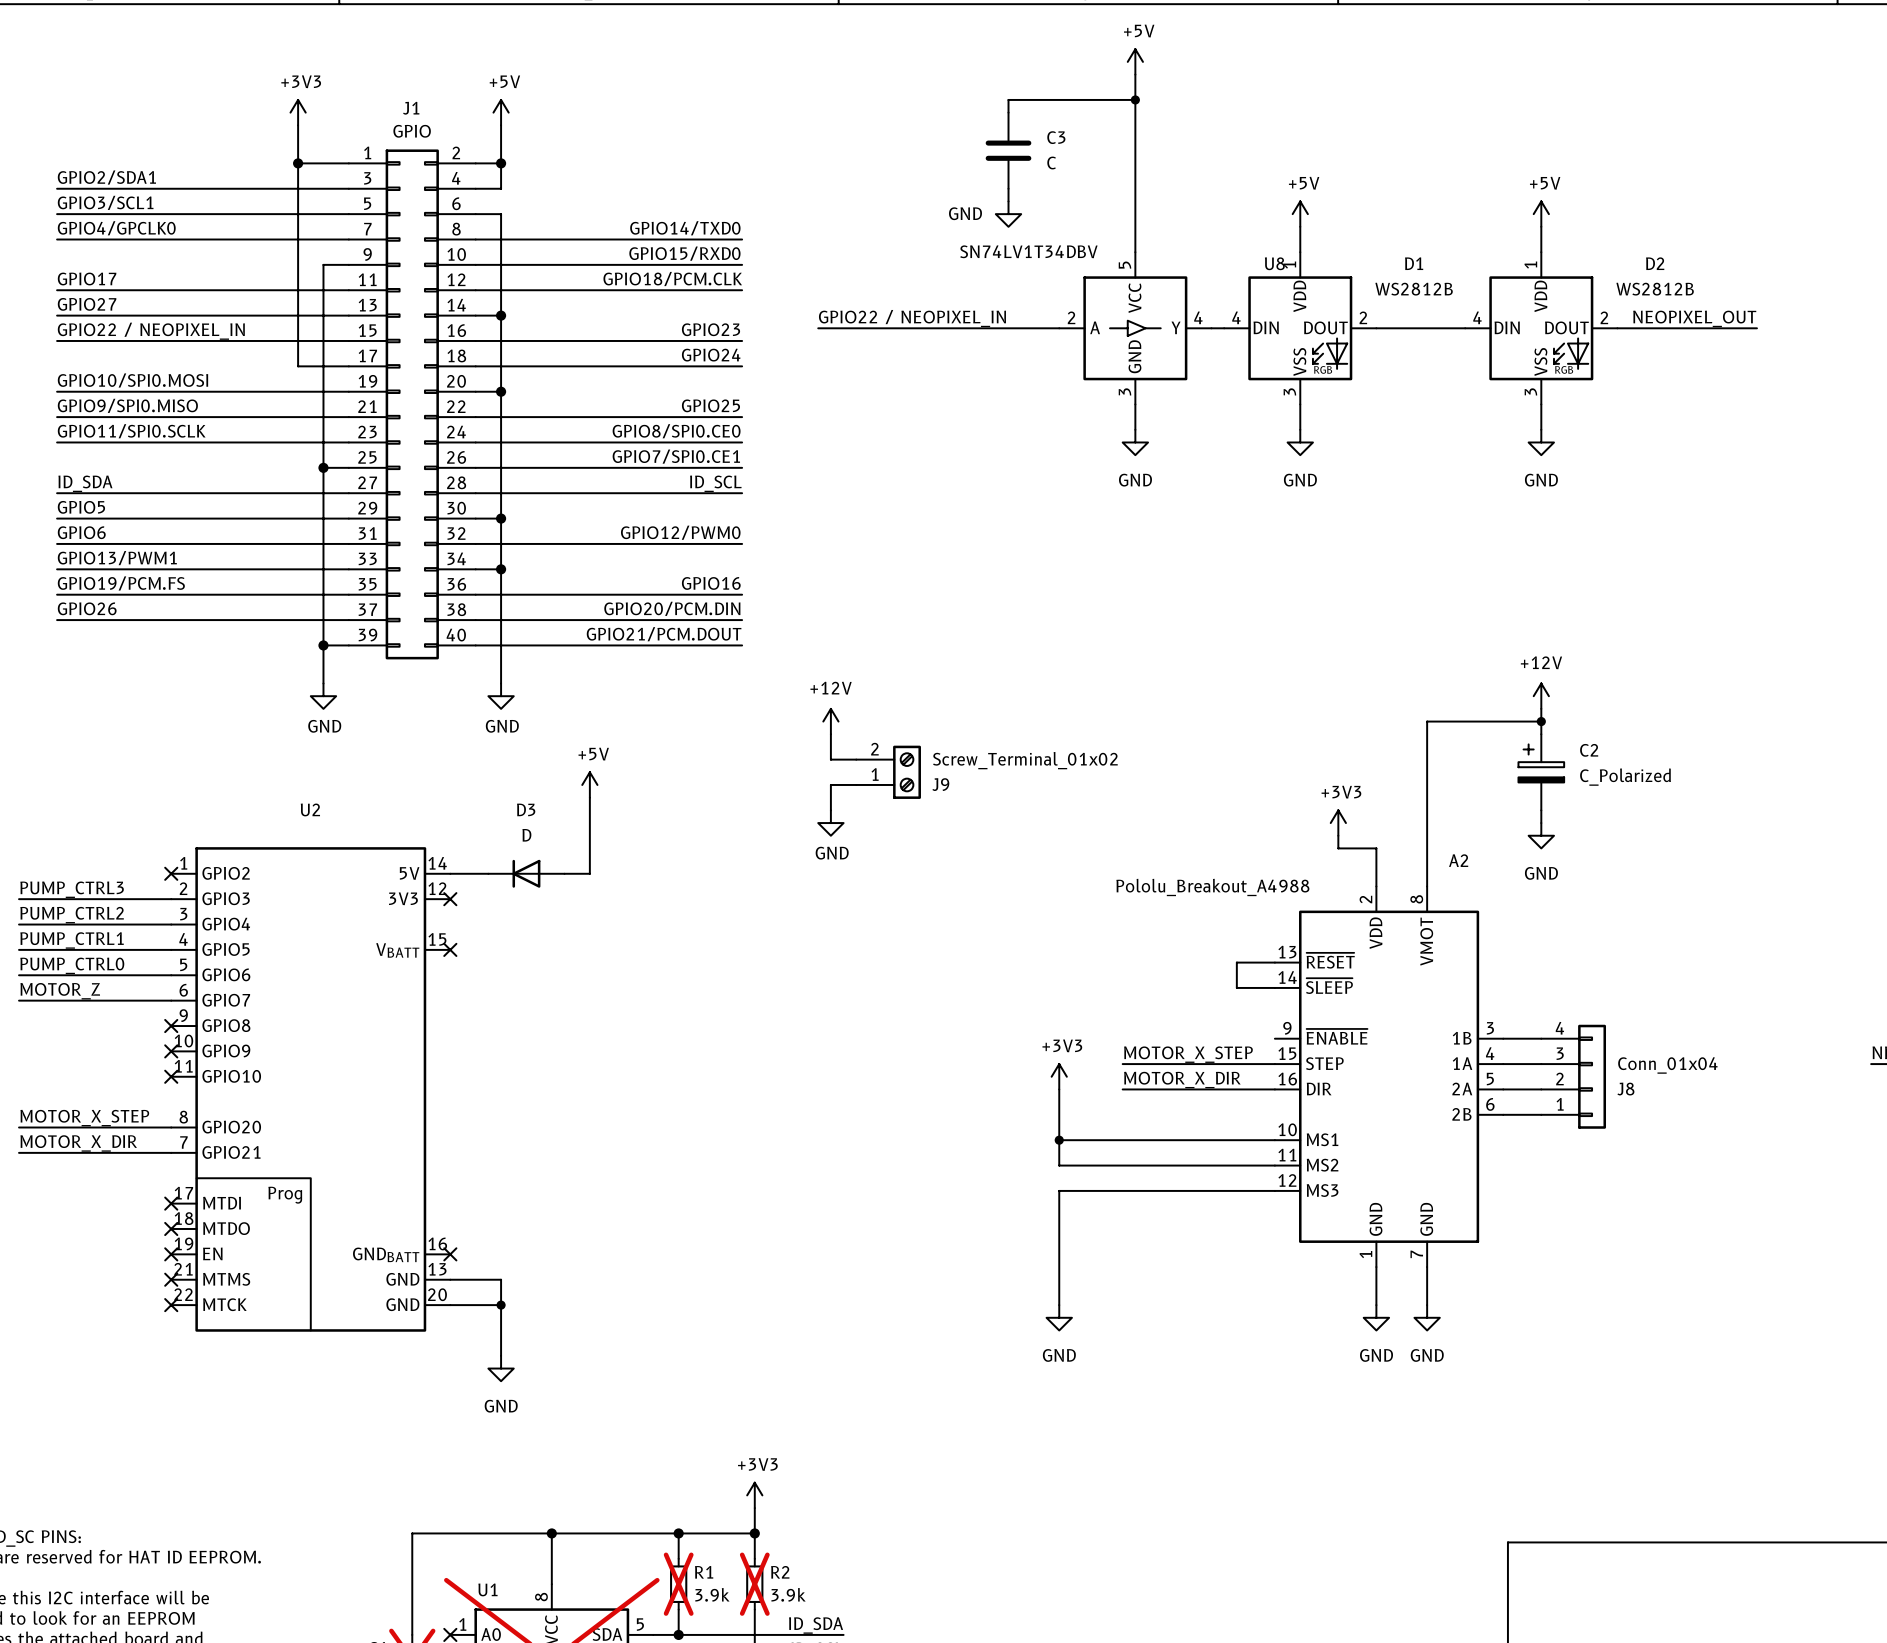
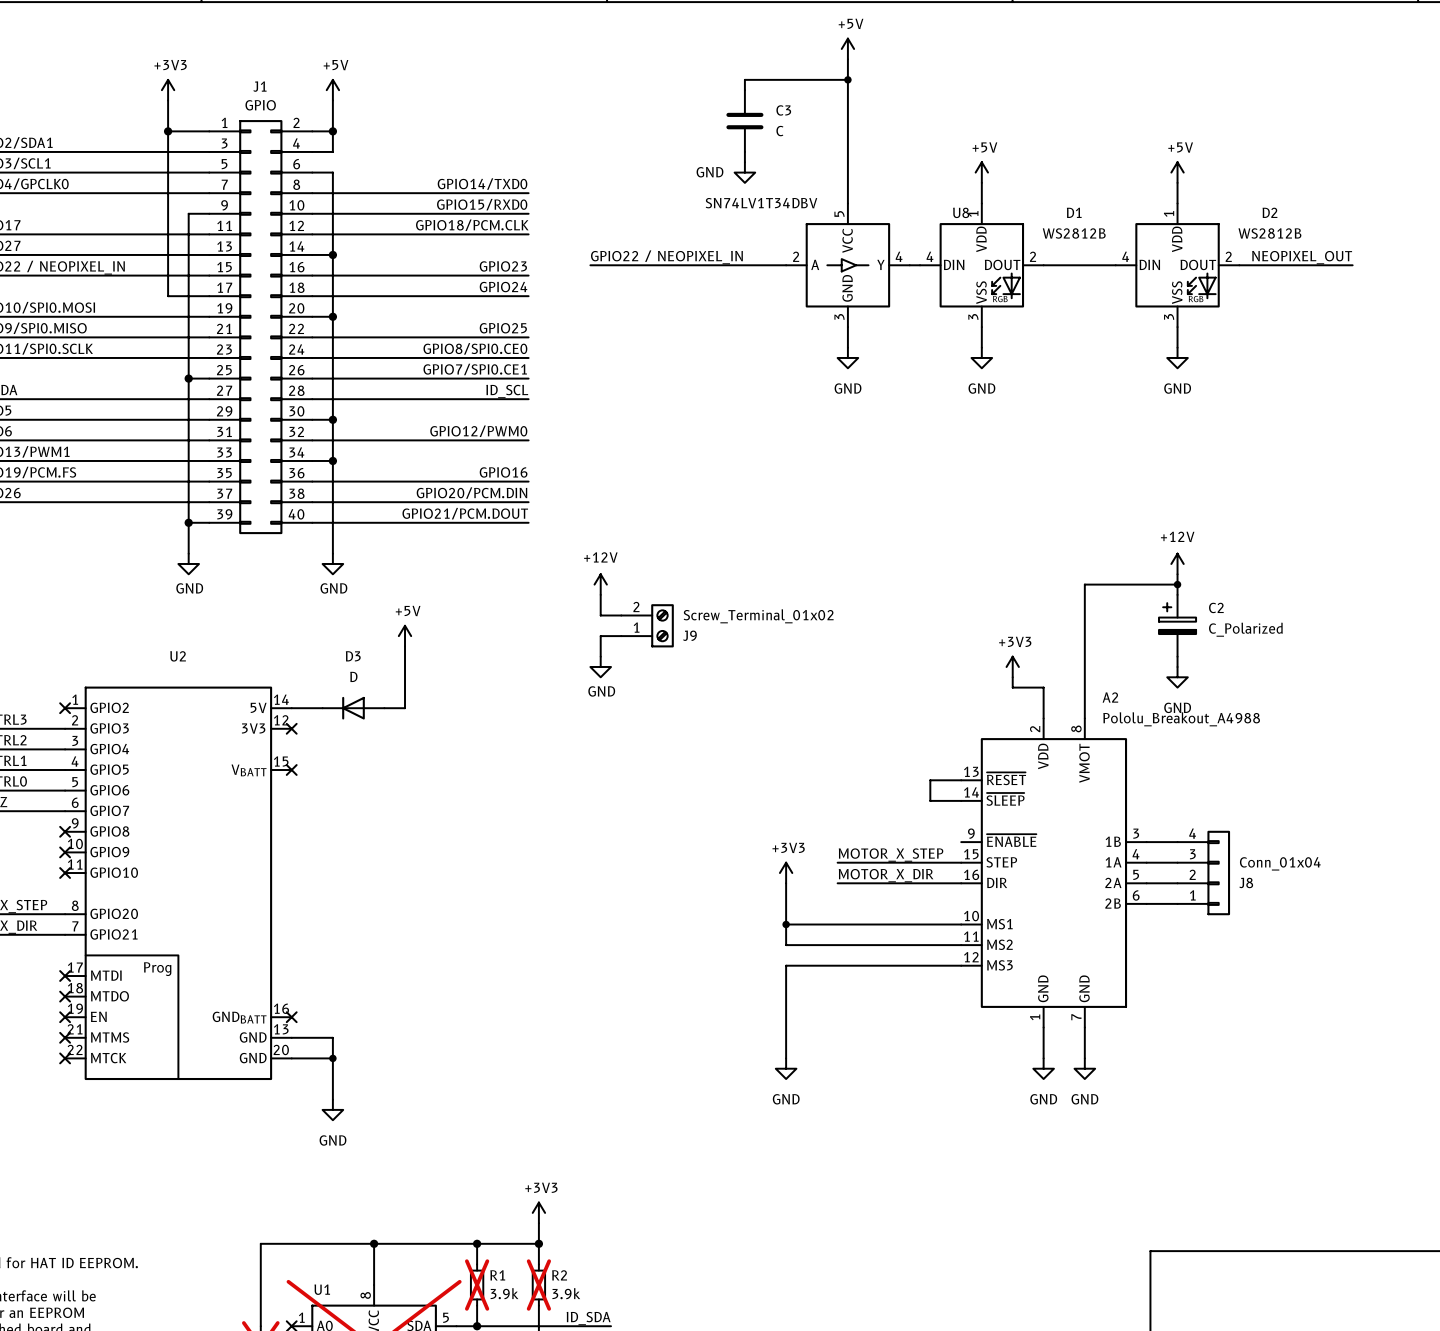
A2 value position: Pololu_Breakout_A4988 (1212, 887) -> Pololu_Breakout_A4988 (1181, 719)

